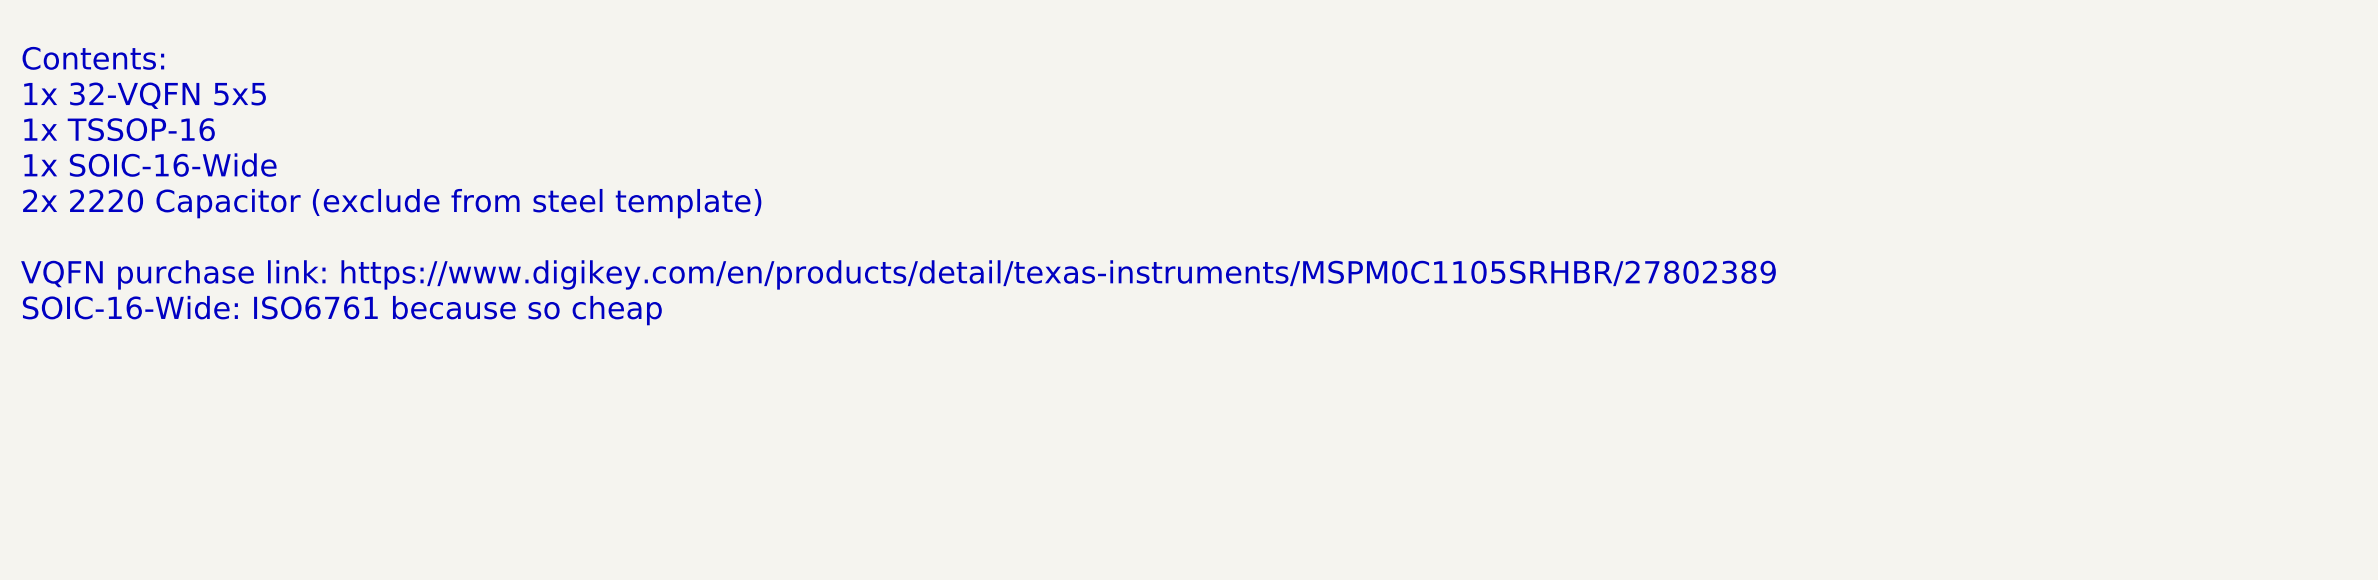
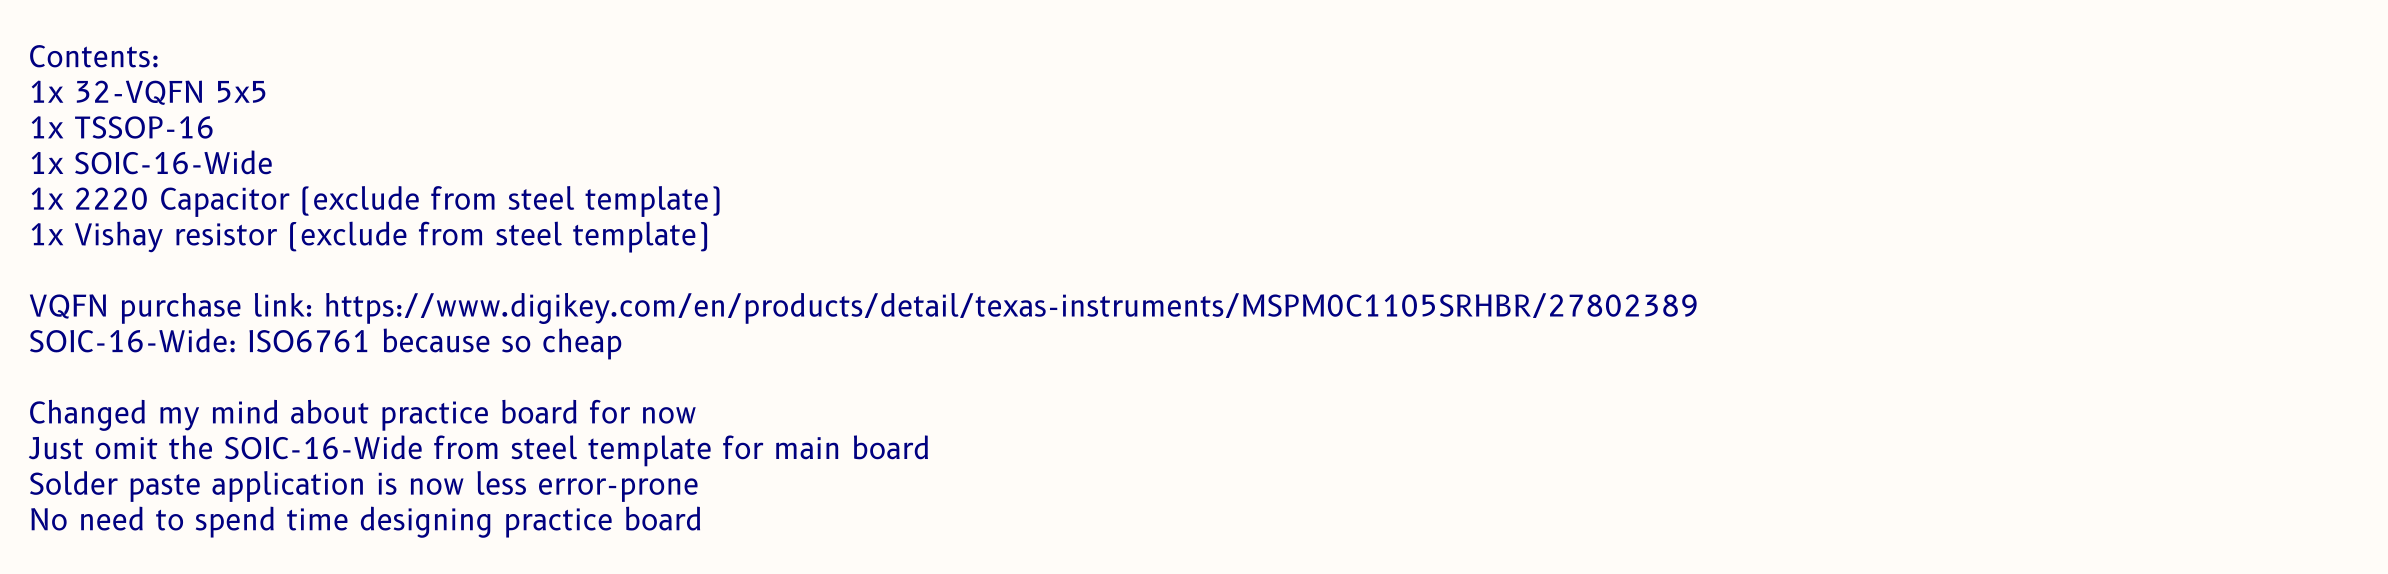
text: 2x 2220 Capacitor (exclude from steel template) (392, 203) -> 1x 2220 Capacitor (exclude from steel template) (375, 201)
text: none -> 1x Vishay resistor (exclude from steel template) (369, 237)
text: VQFN purchase link: https://www.digikey.com/en/products/detail/texas-instruments/MSPM0C1105SRHBR/27802389 (898, 274) -> none
text: SOIC-16-Wide: ISO6761 because so cheap (342, 310) -> VQFN purchase link: https://www.digikey.com/en/products/detail/texas-instruments/MSPM0C1105SRHBR/27802389 (863, 308)
text: none -> SOIC-16-Wide: ISO6761 because so cheap (325, 343)
text: none -> Changed my mind about practice board for now (362, 415)
text: none -> Just omit the SOIC-16-Wide from steel template for main board (478, 450)
text: none -> Solder paste application is now less error-prone (363, 486)
text: none -> No need to spend time designing practice board (365, 522)

